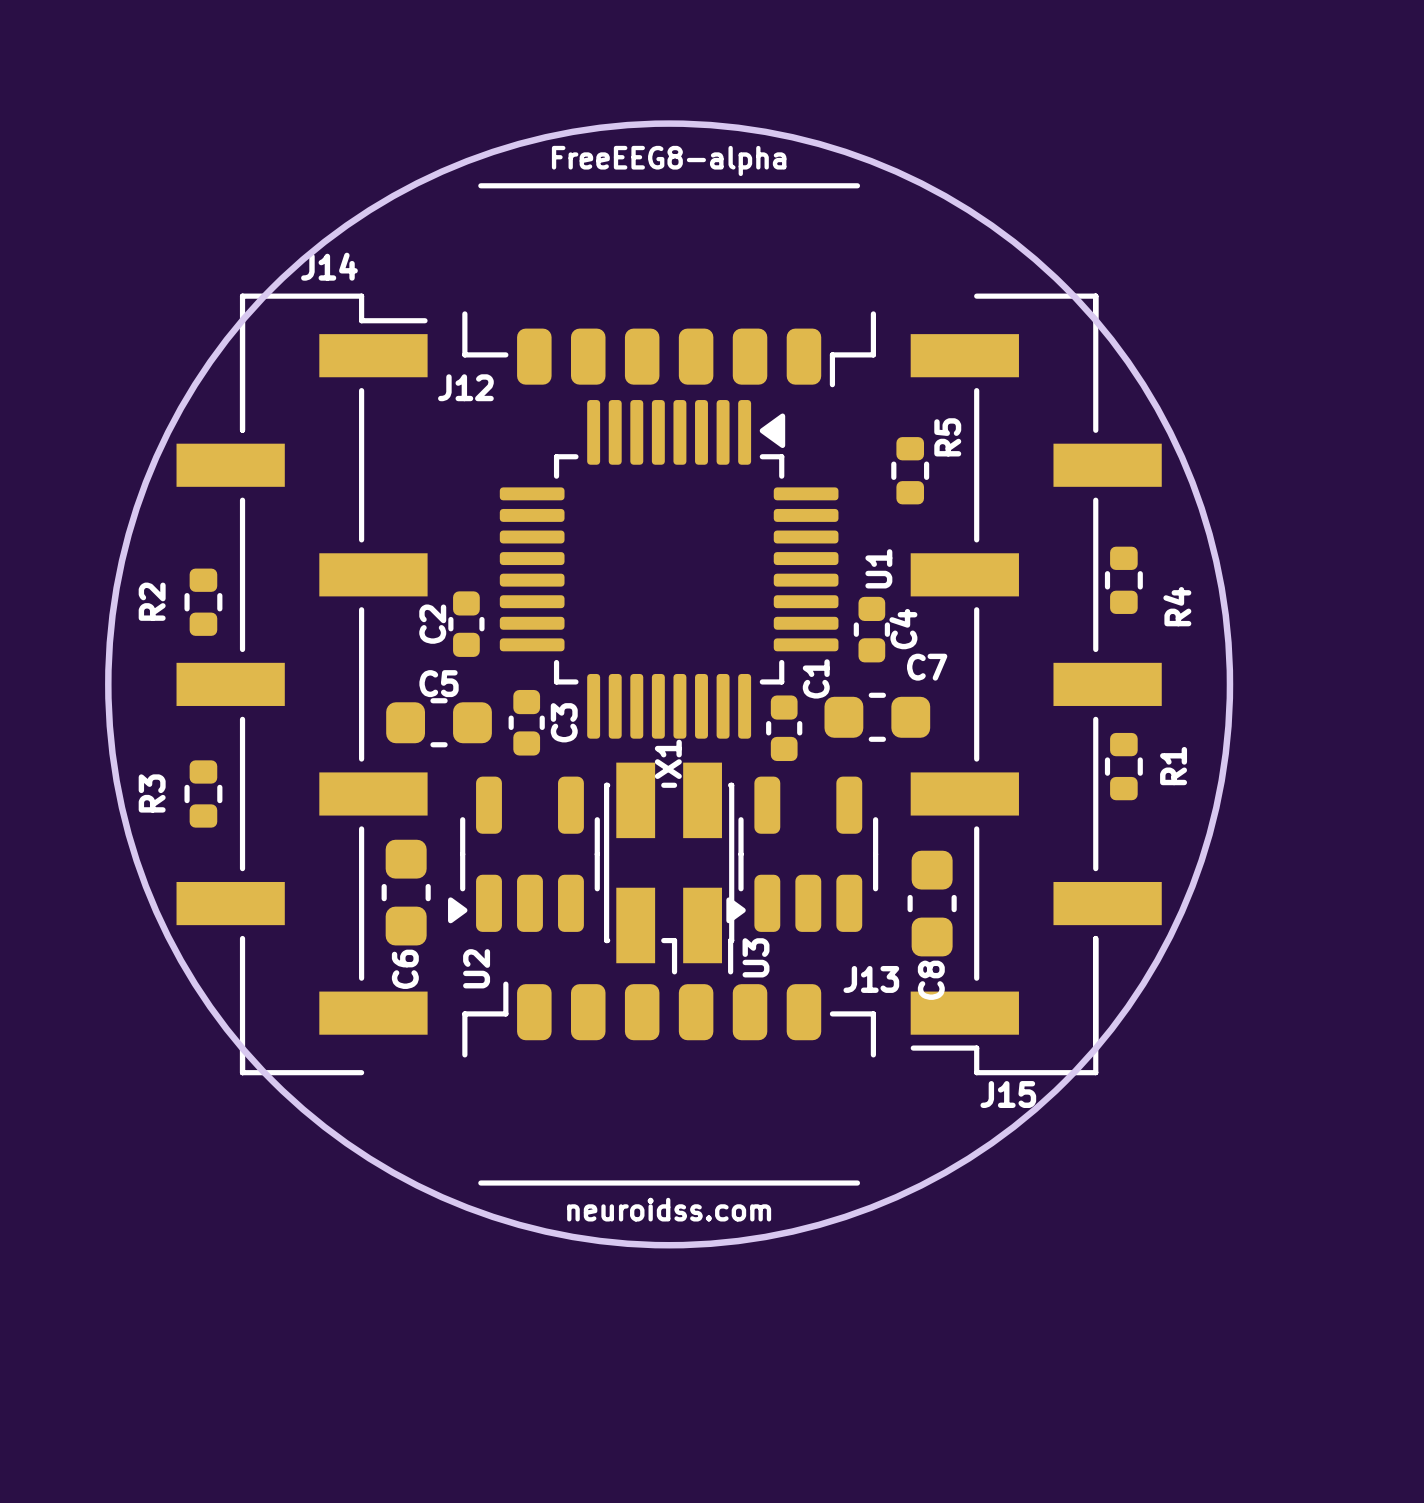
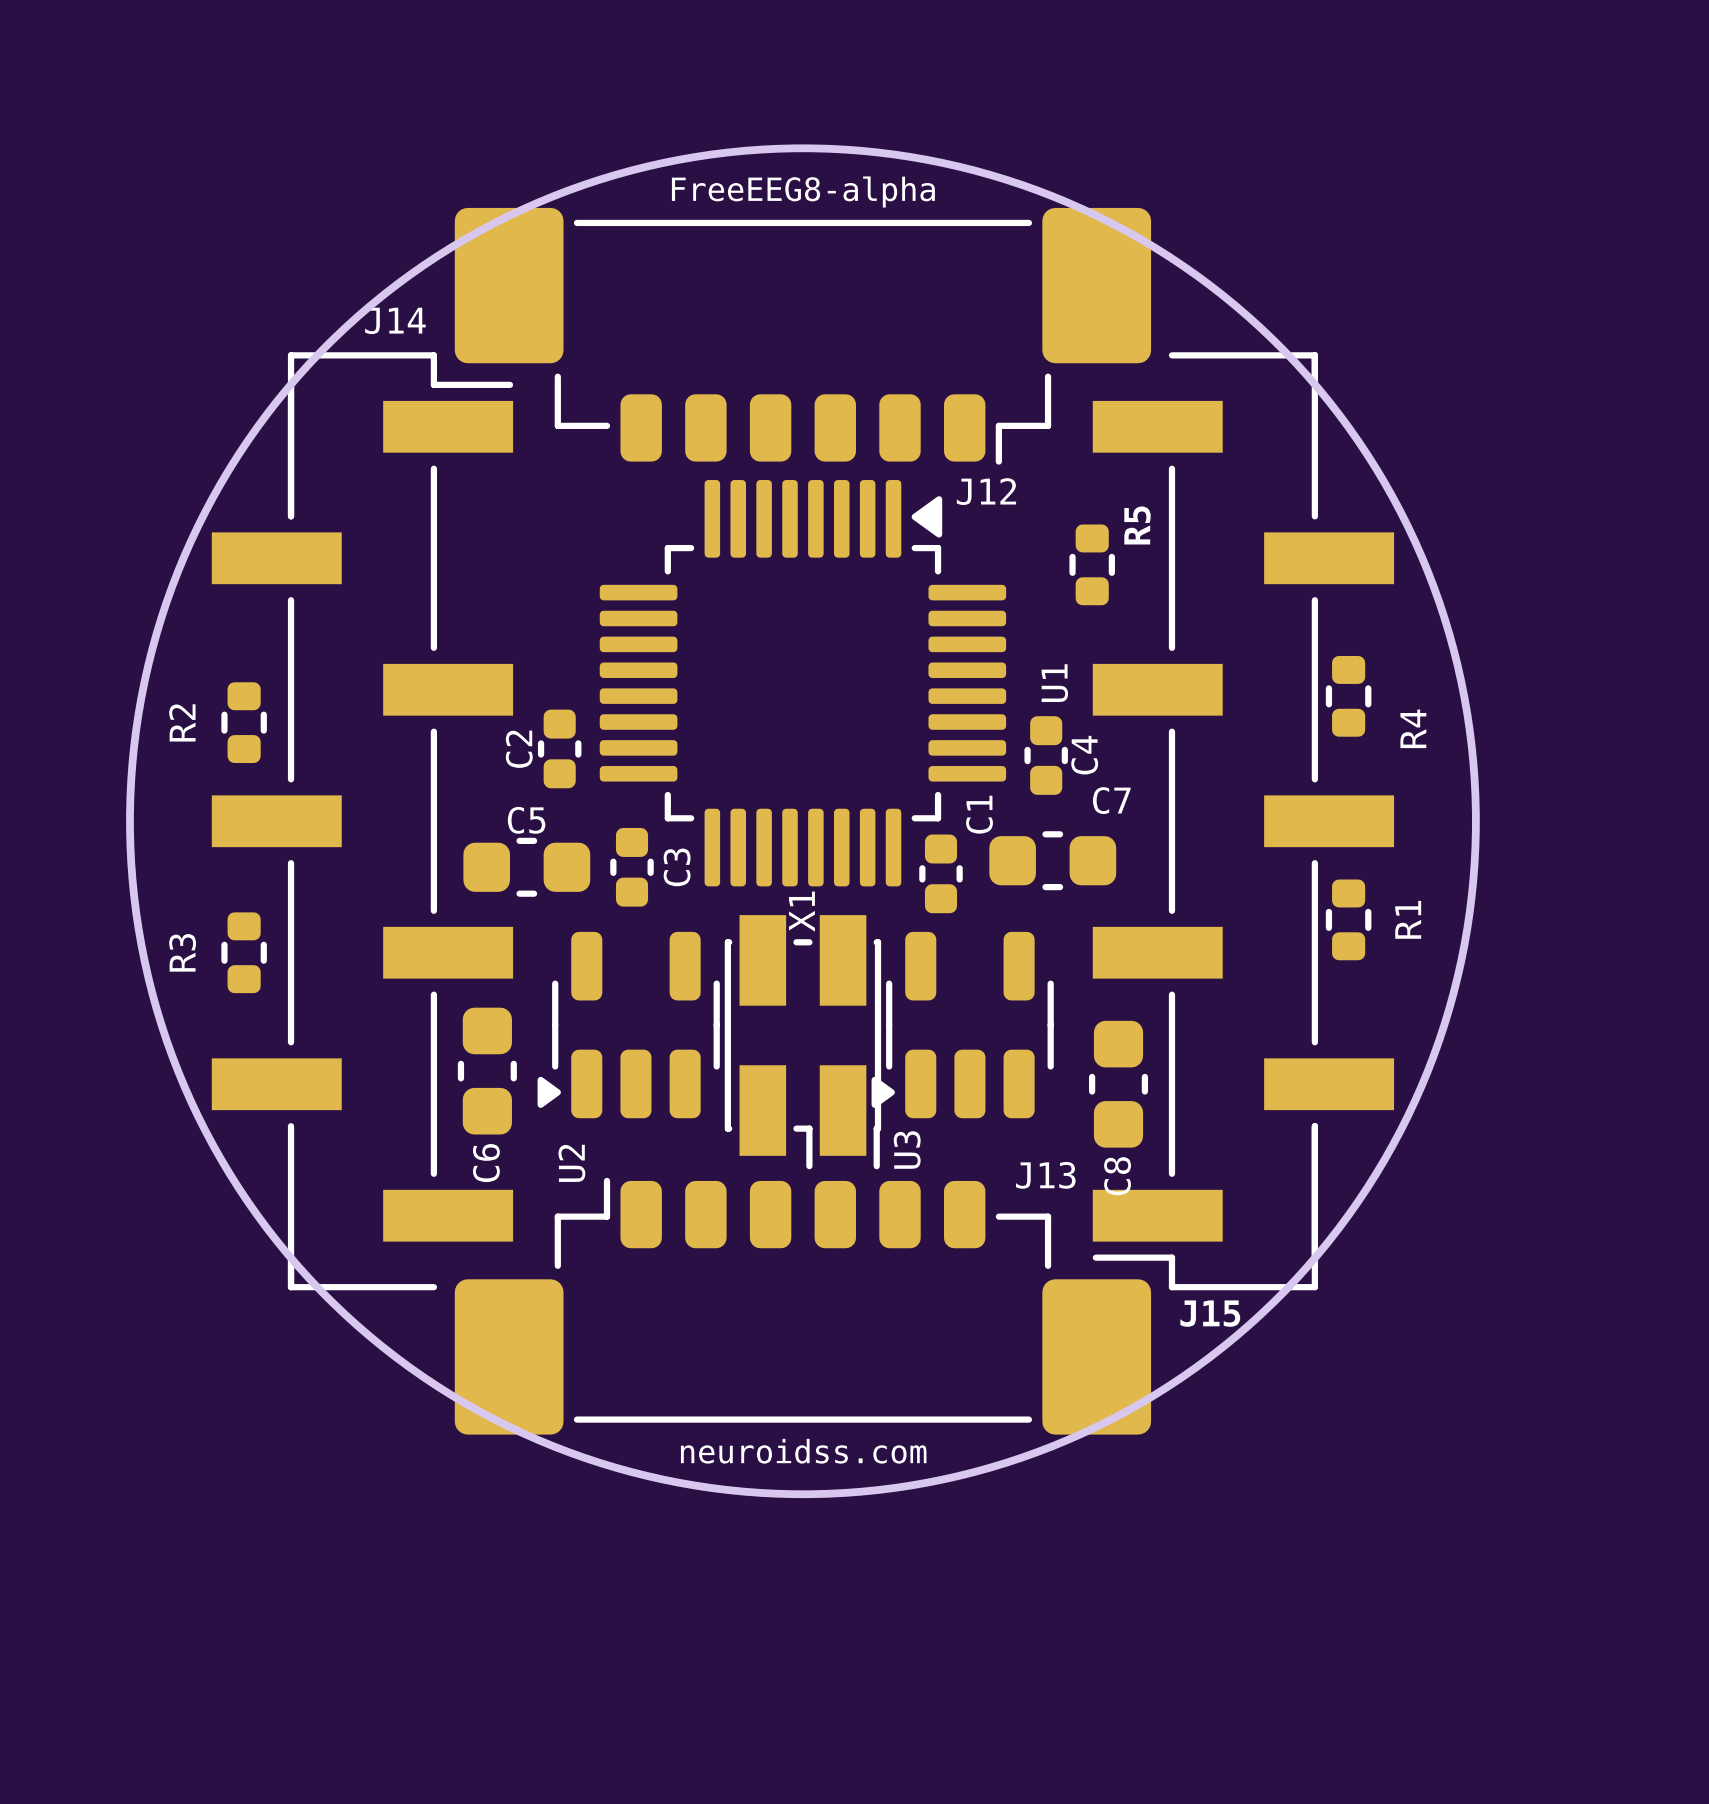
J12 footprint: [462, 183, 877, 388] -> [454, 207, 1152, 465]
J12 name position: J12 (465, 387) -> J12 (986, 491)
J13 footprint: [462, 981, 877, 1186] -> [454, 1177, 1152, 1435]

